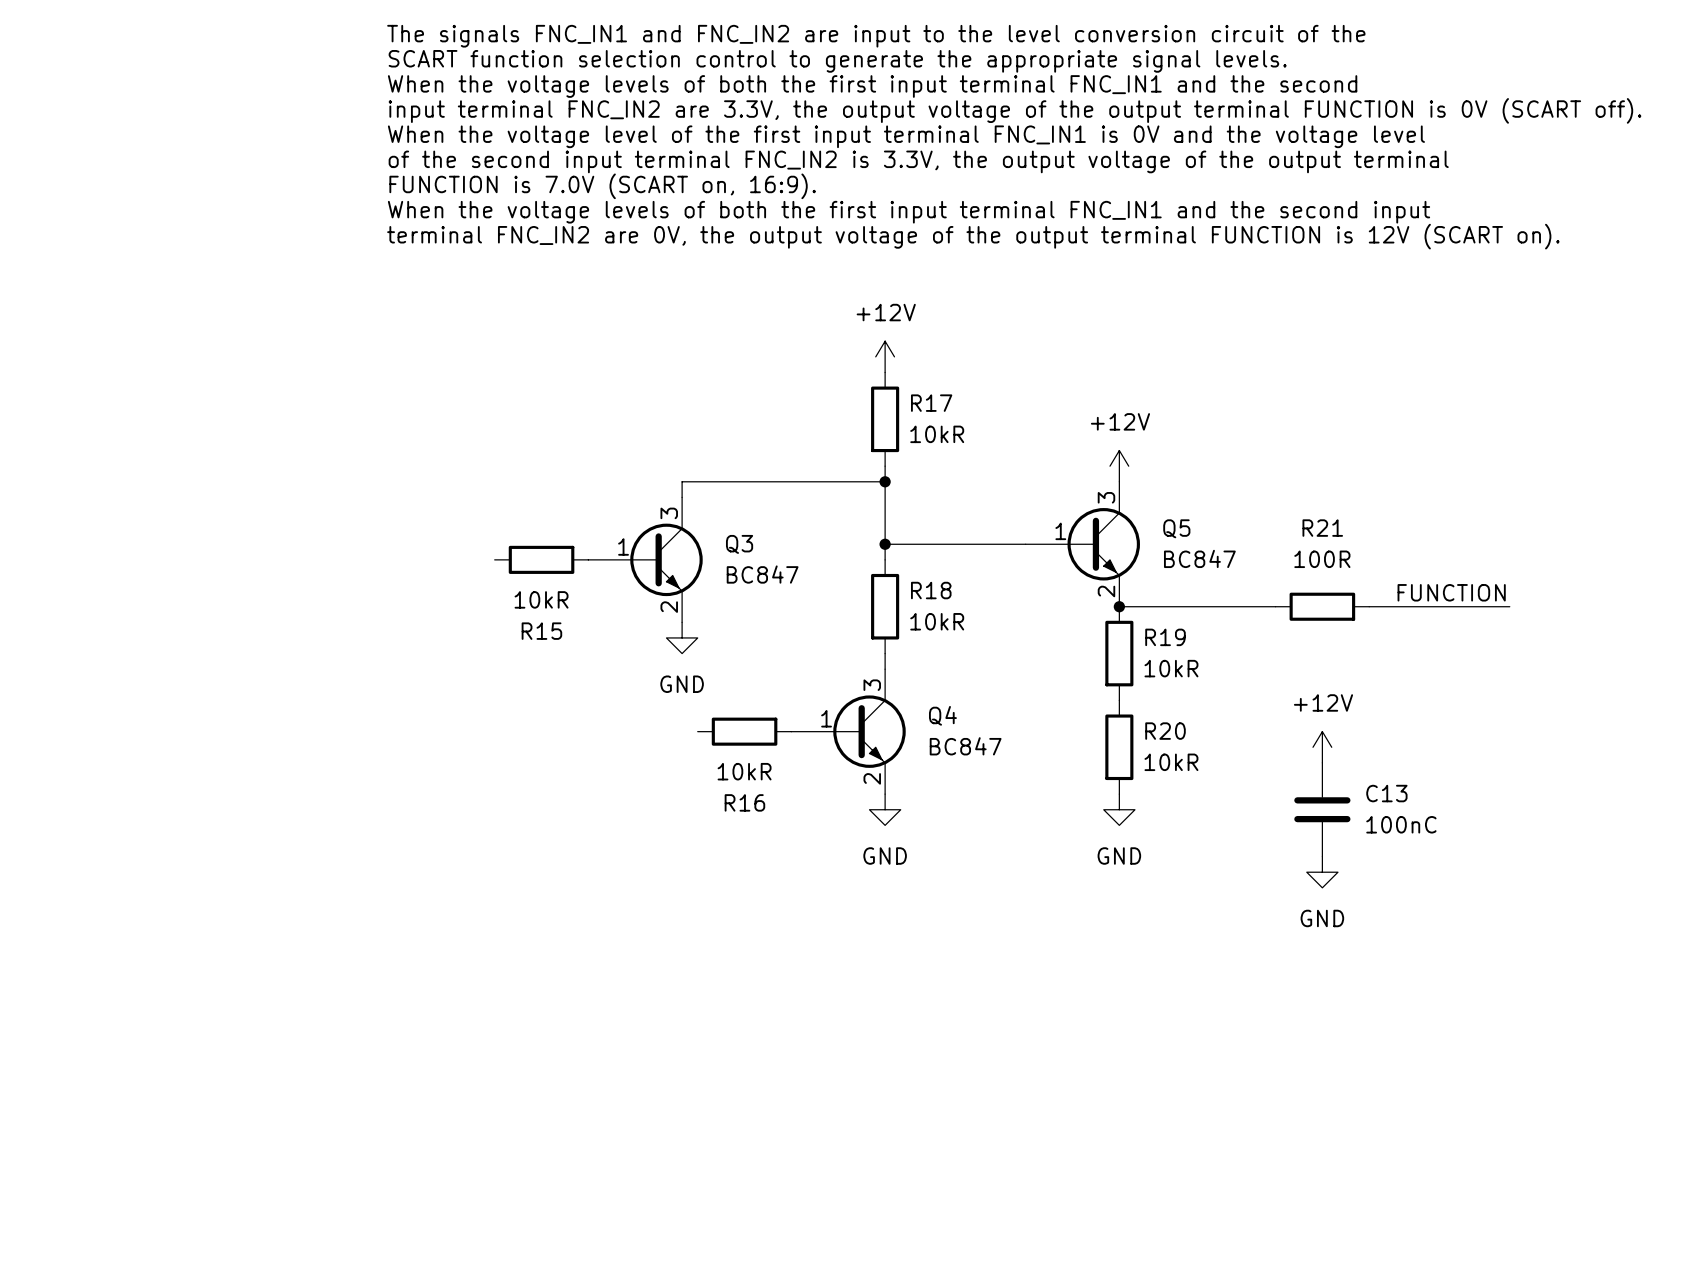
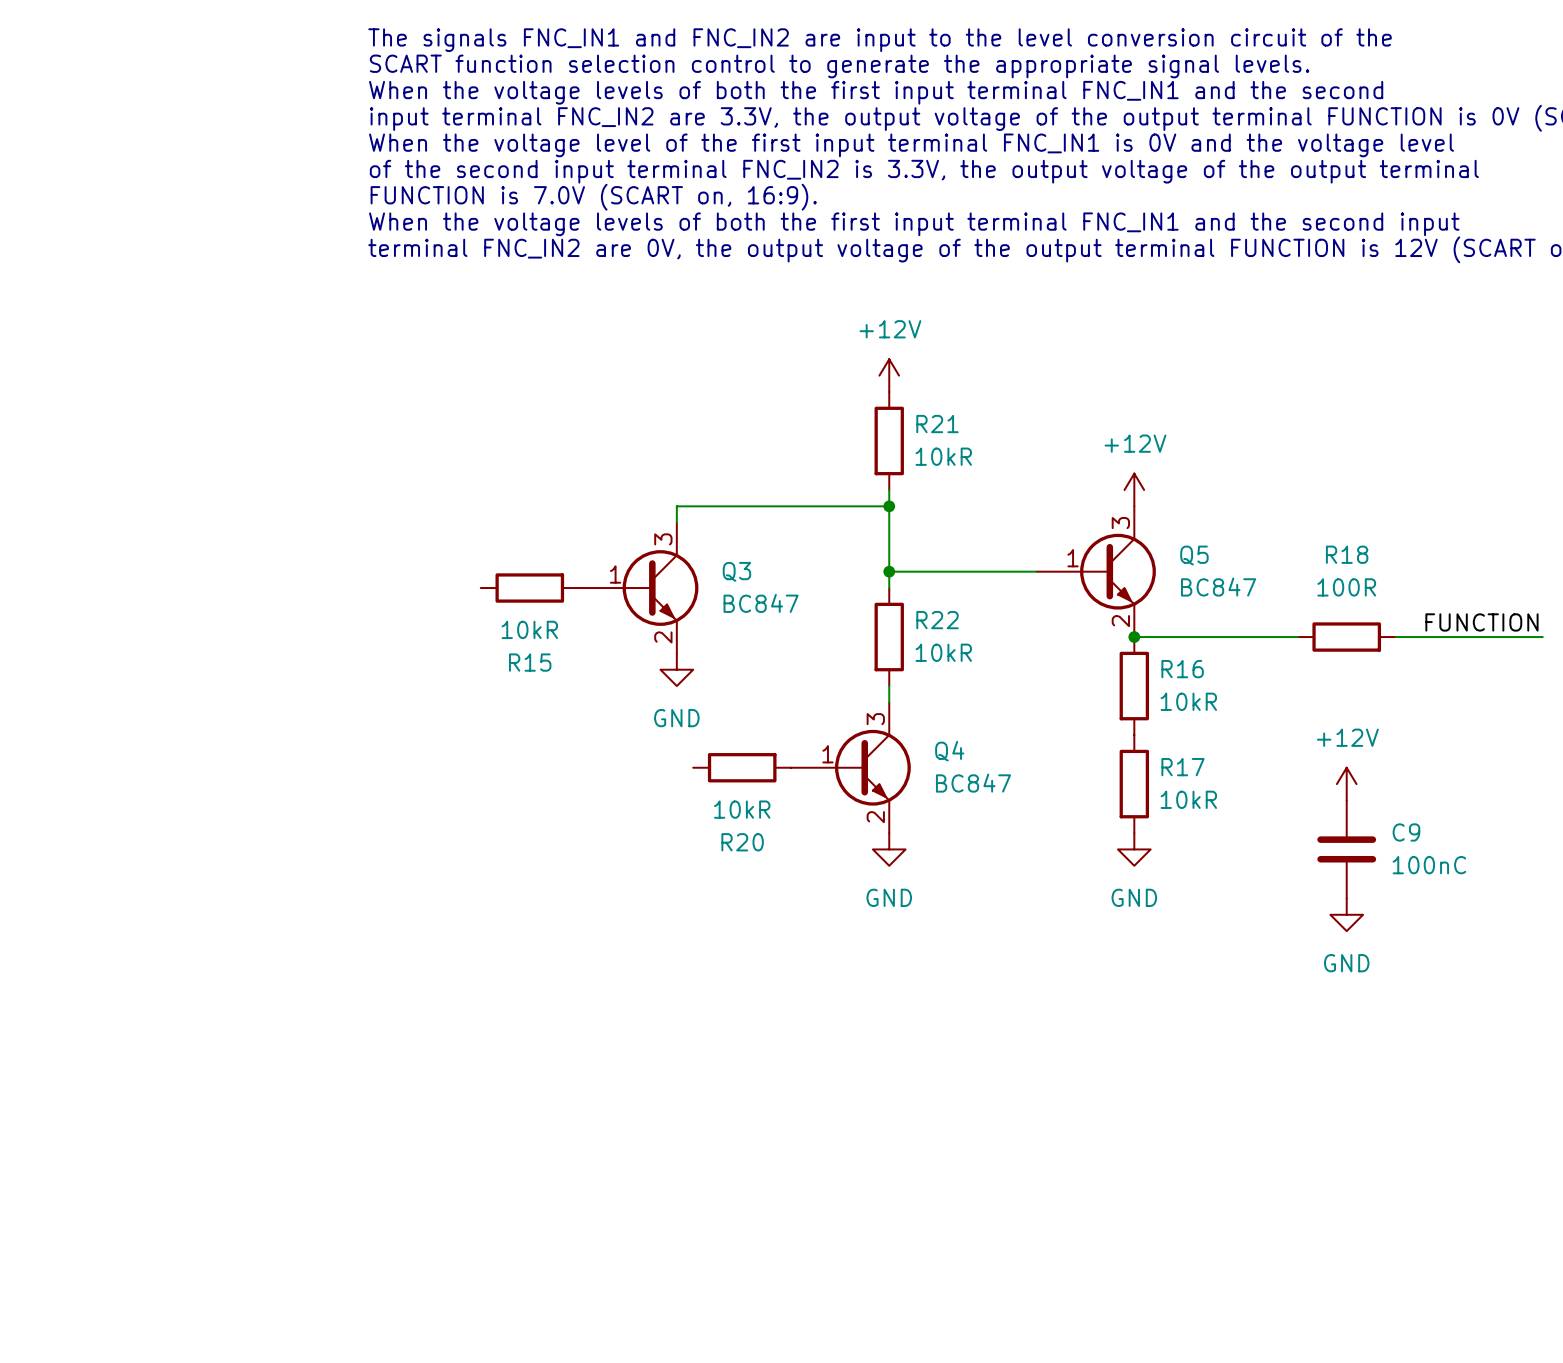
R17 name: R17 (931, 403) -> R21 (937, 424)
R21 name: R21 (1322, 528) -> R18 (1347, 554)
R18 name: R18 (931, 590) -> R22 (937, 620)
R19 name: R19 (1165, 637) -> R16 (1182, 669)
R20 name: R20 (1165, 731) -> R17 (1182, 767)
C13 name: C13 (1386, 793) -> C9 (1406, 832)
R16 name: R16 (744, 802) -> R20 (742, 842)

